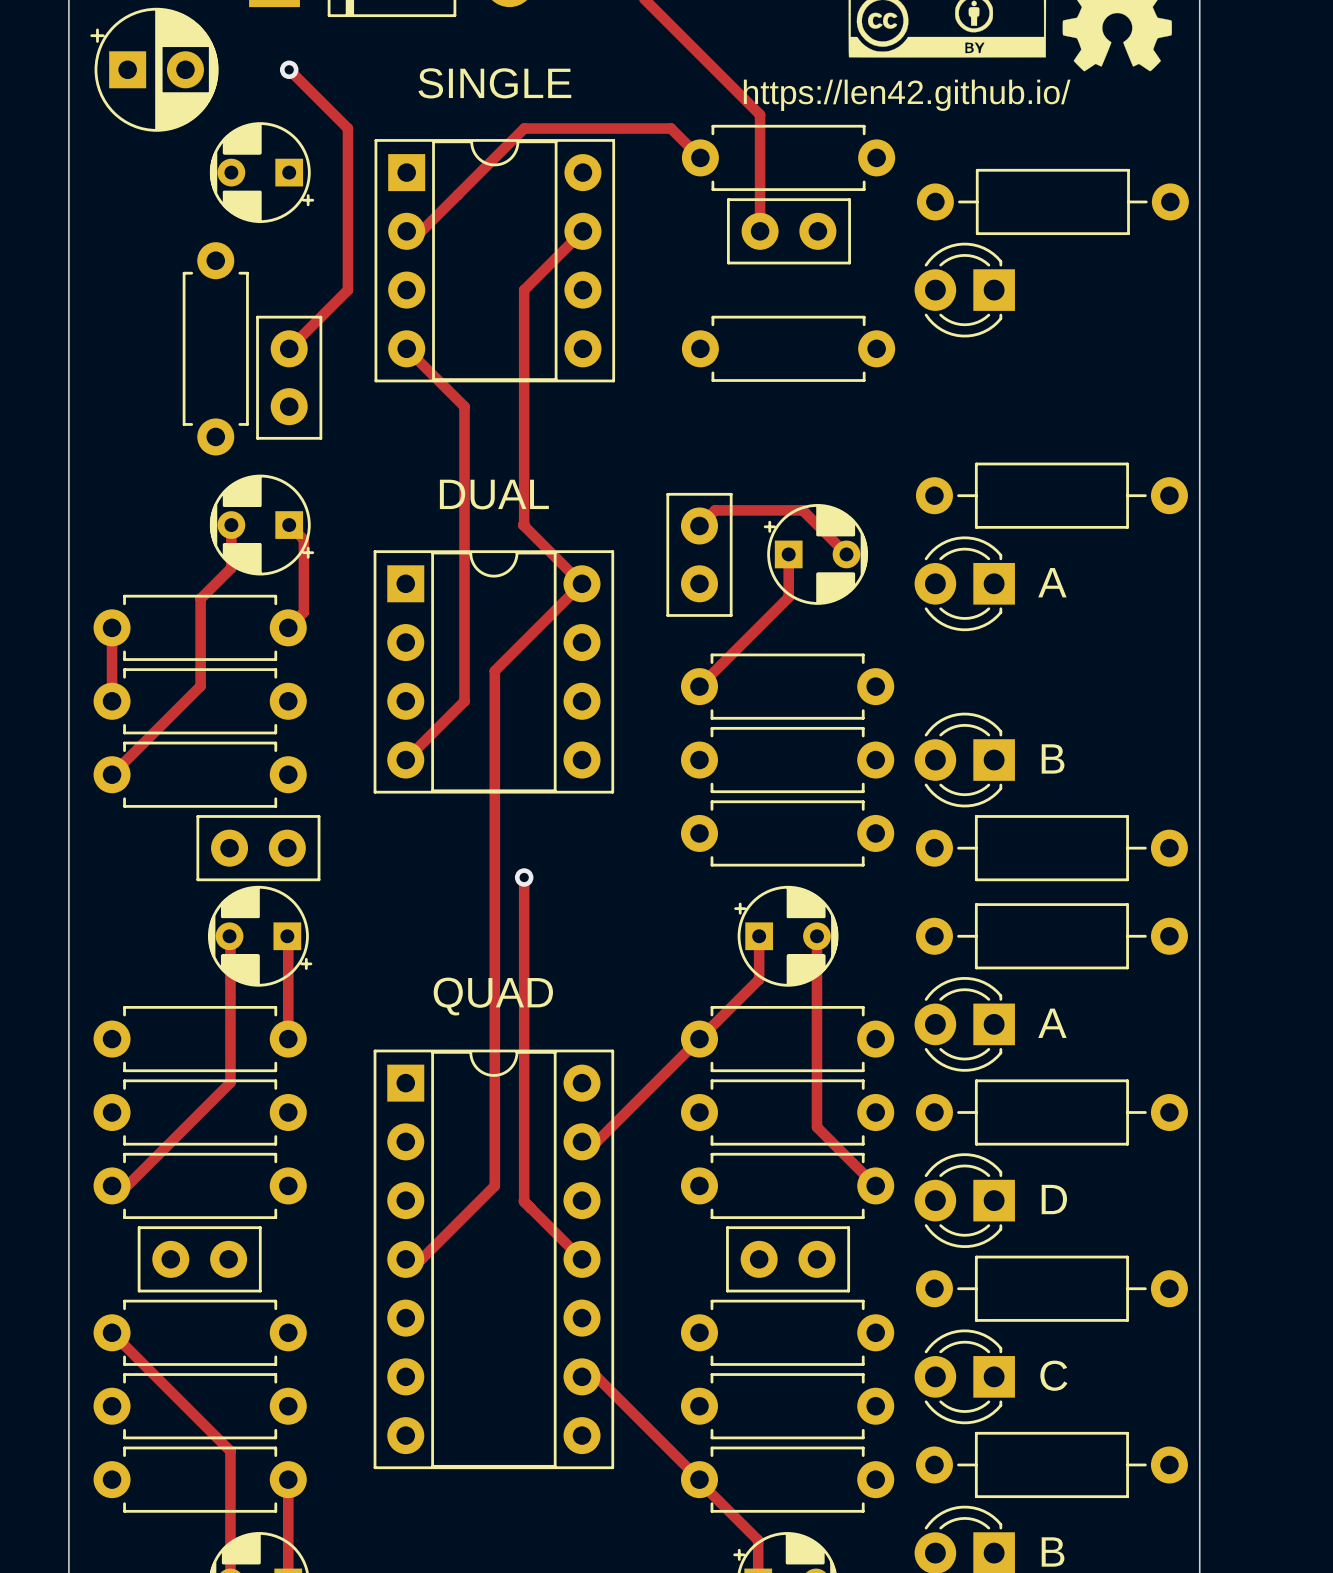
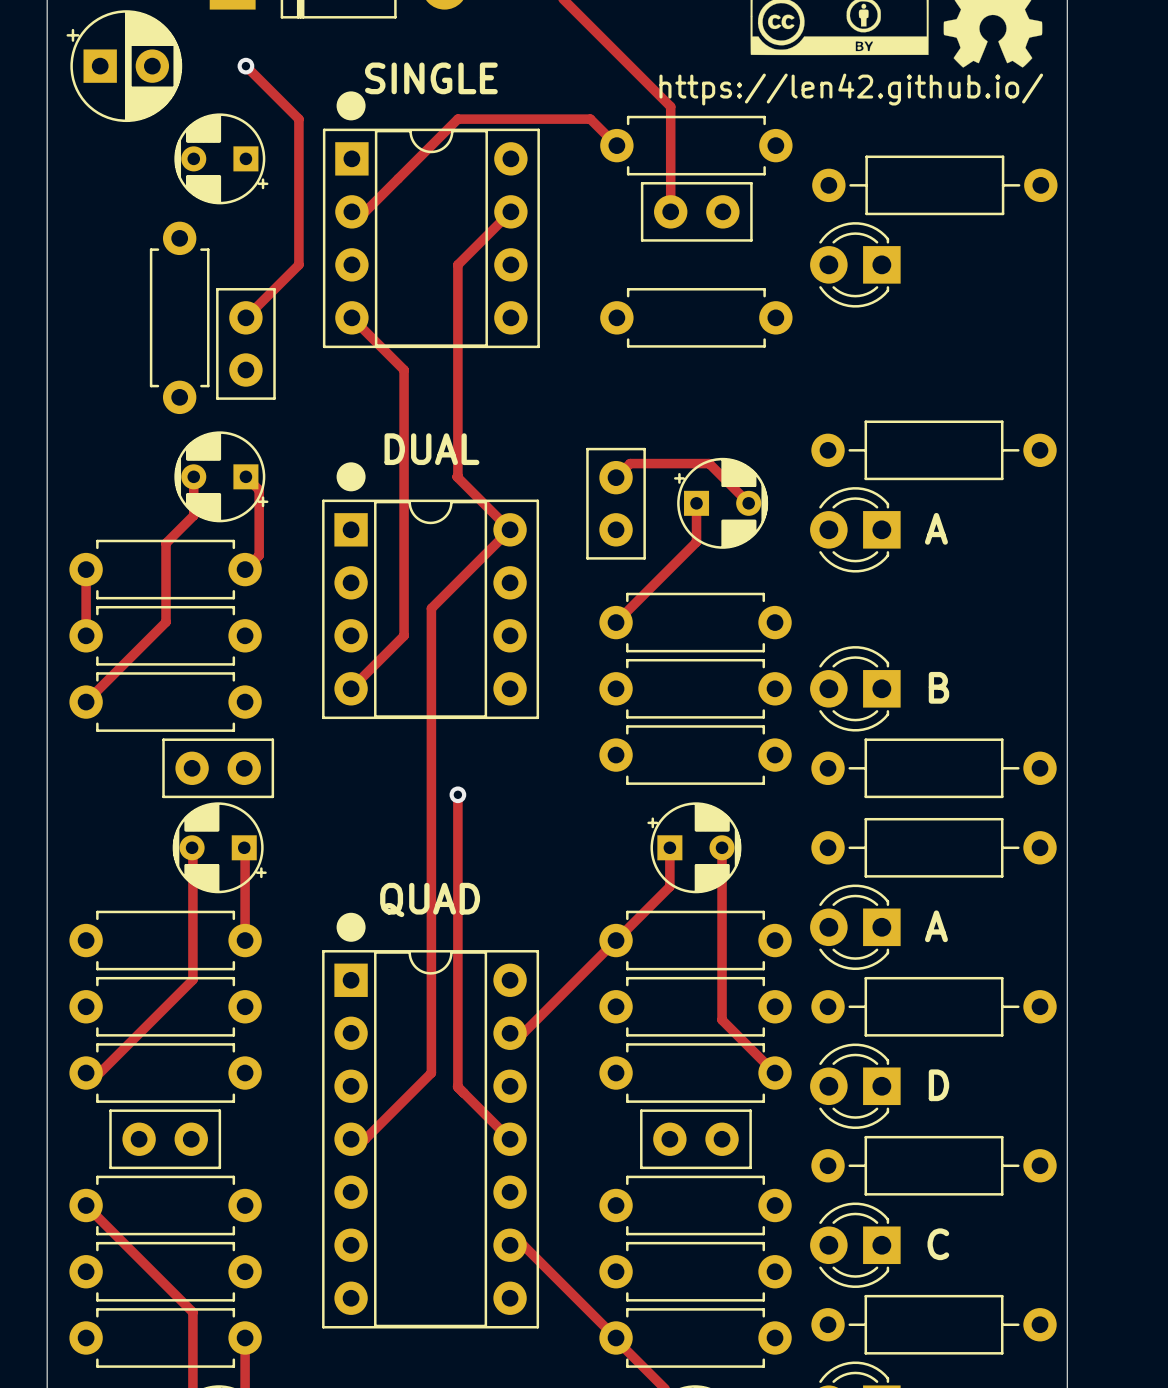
drawing: none -> [336, 91, 366, 121]
drawing: none -> [336, 462, 366, 492]
drawing: none -> [336, 912, 366, 942]

